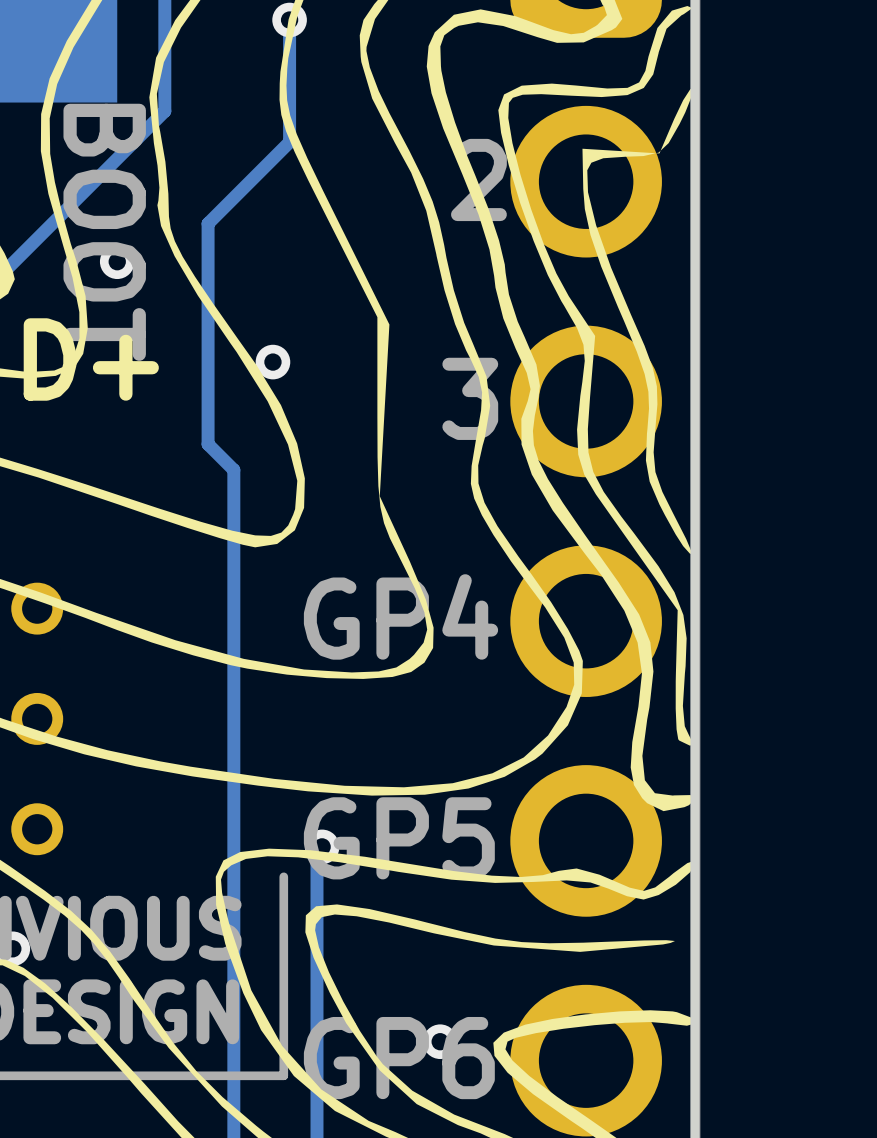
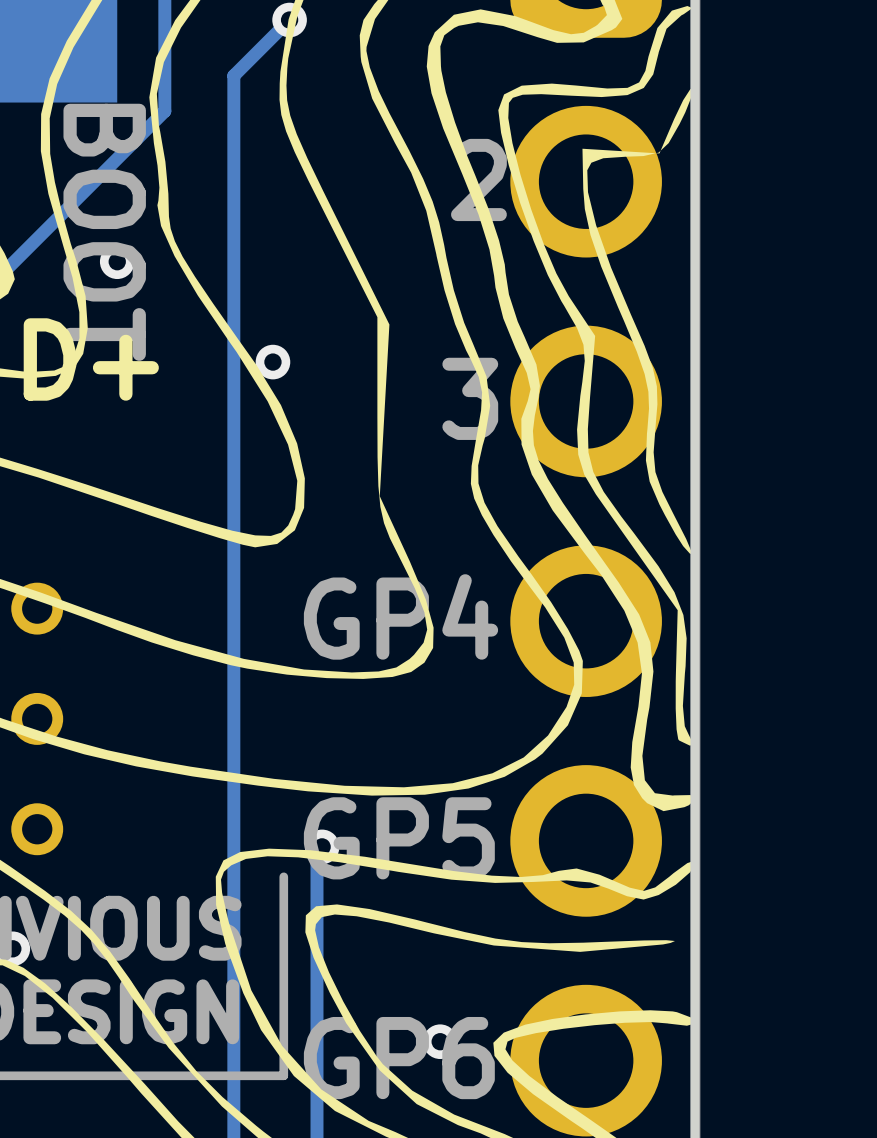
track: (289, 20) (289, 142) (208, 223) (208, 444) (233, 470) -> (289, 20) (233, 75) (233, 470)

